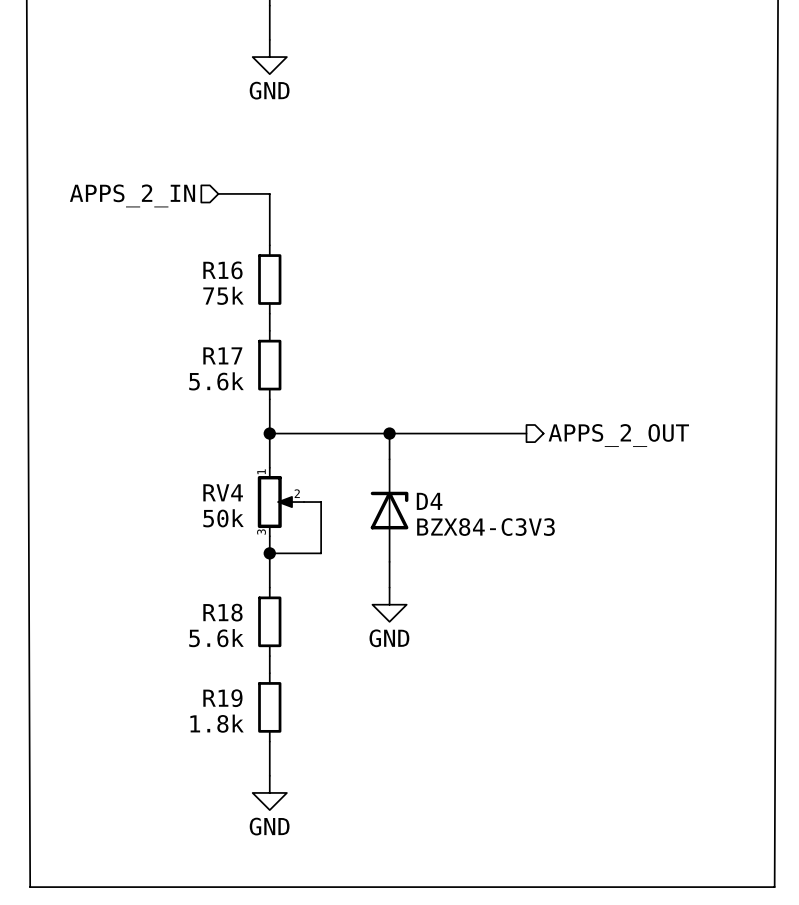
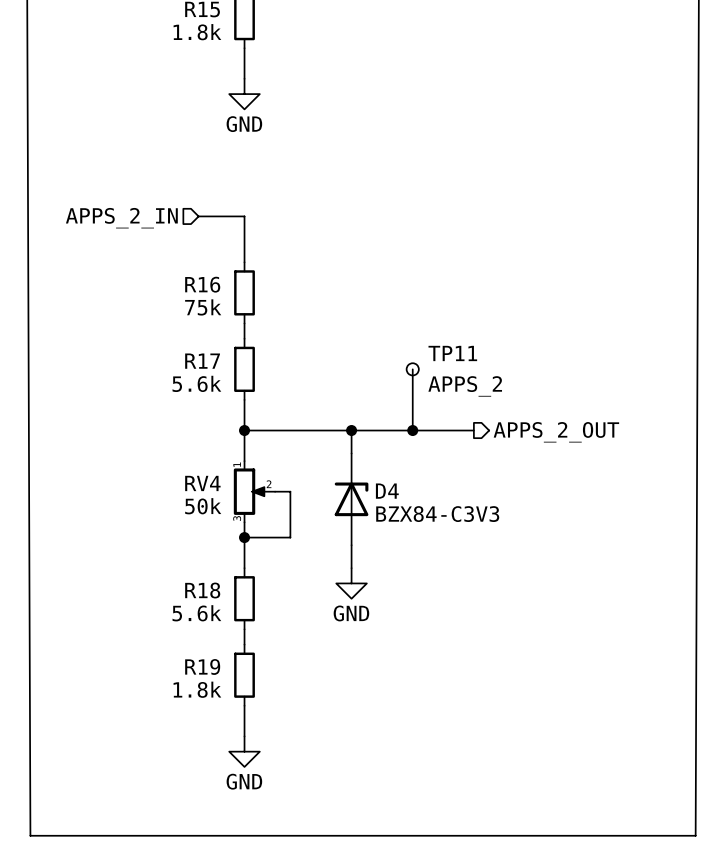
wire: none -> (412, 369) (412, 430)
TP11: none -> APPS_2 (412, 369)
junction: none -> (412, 430)

